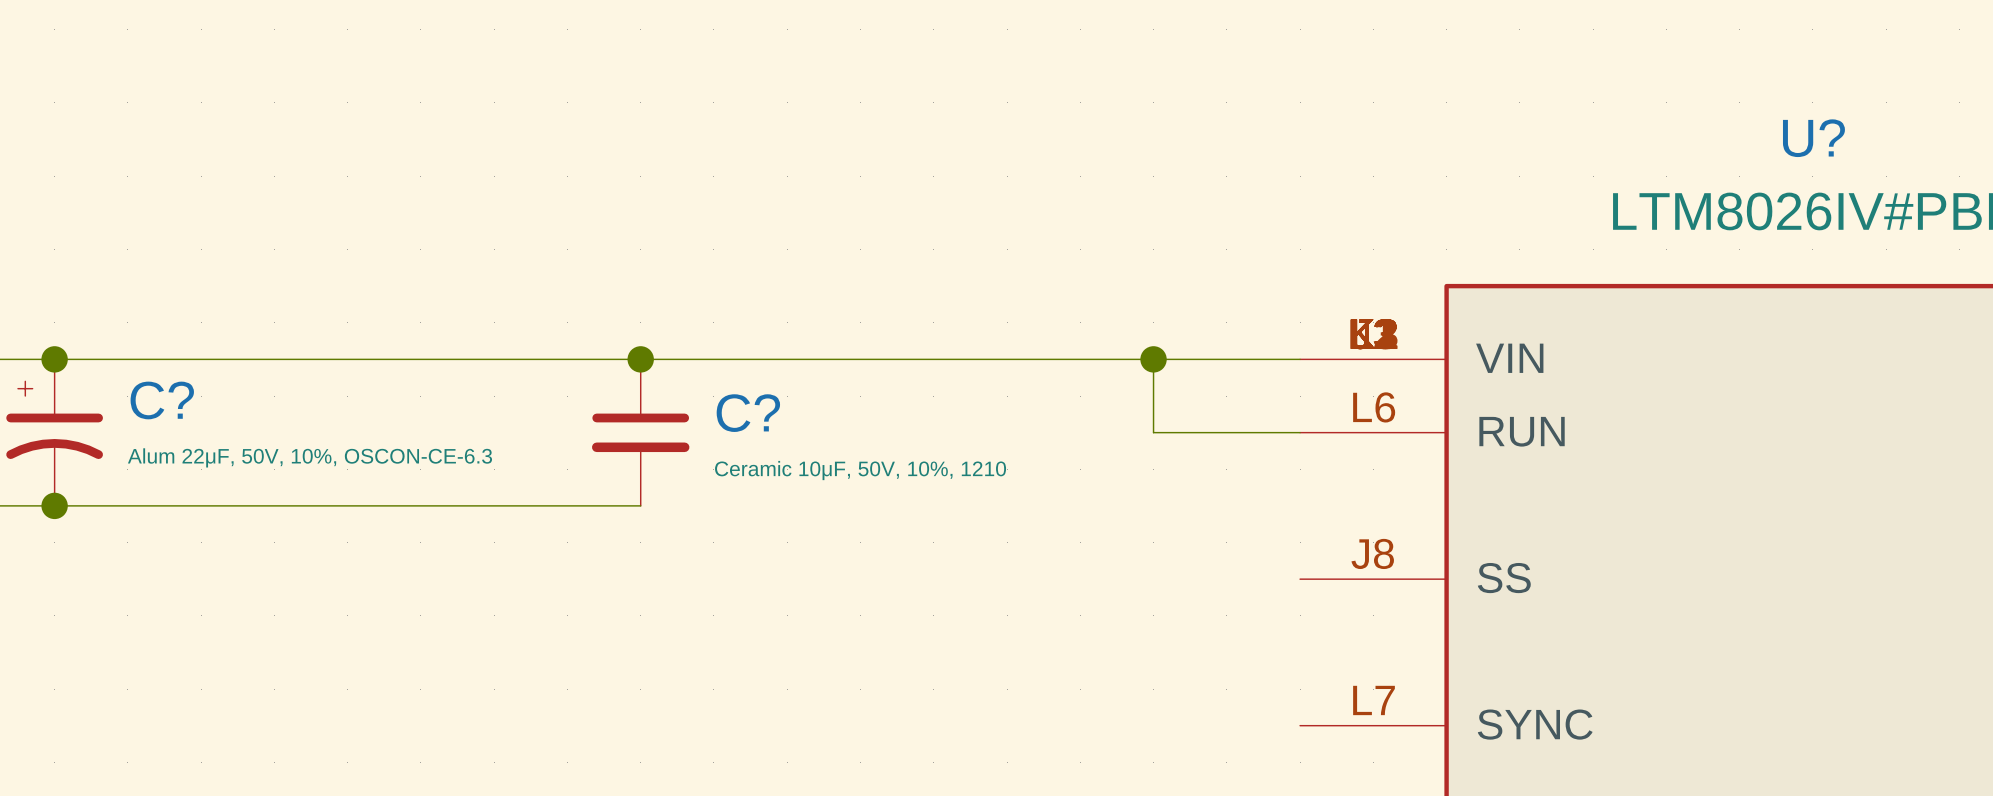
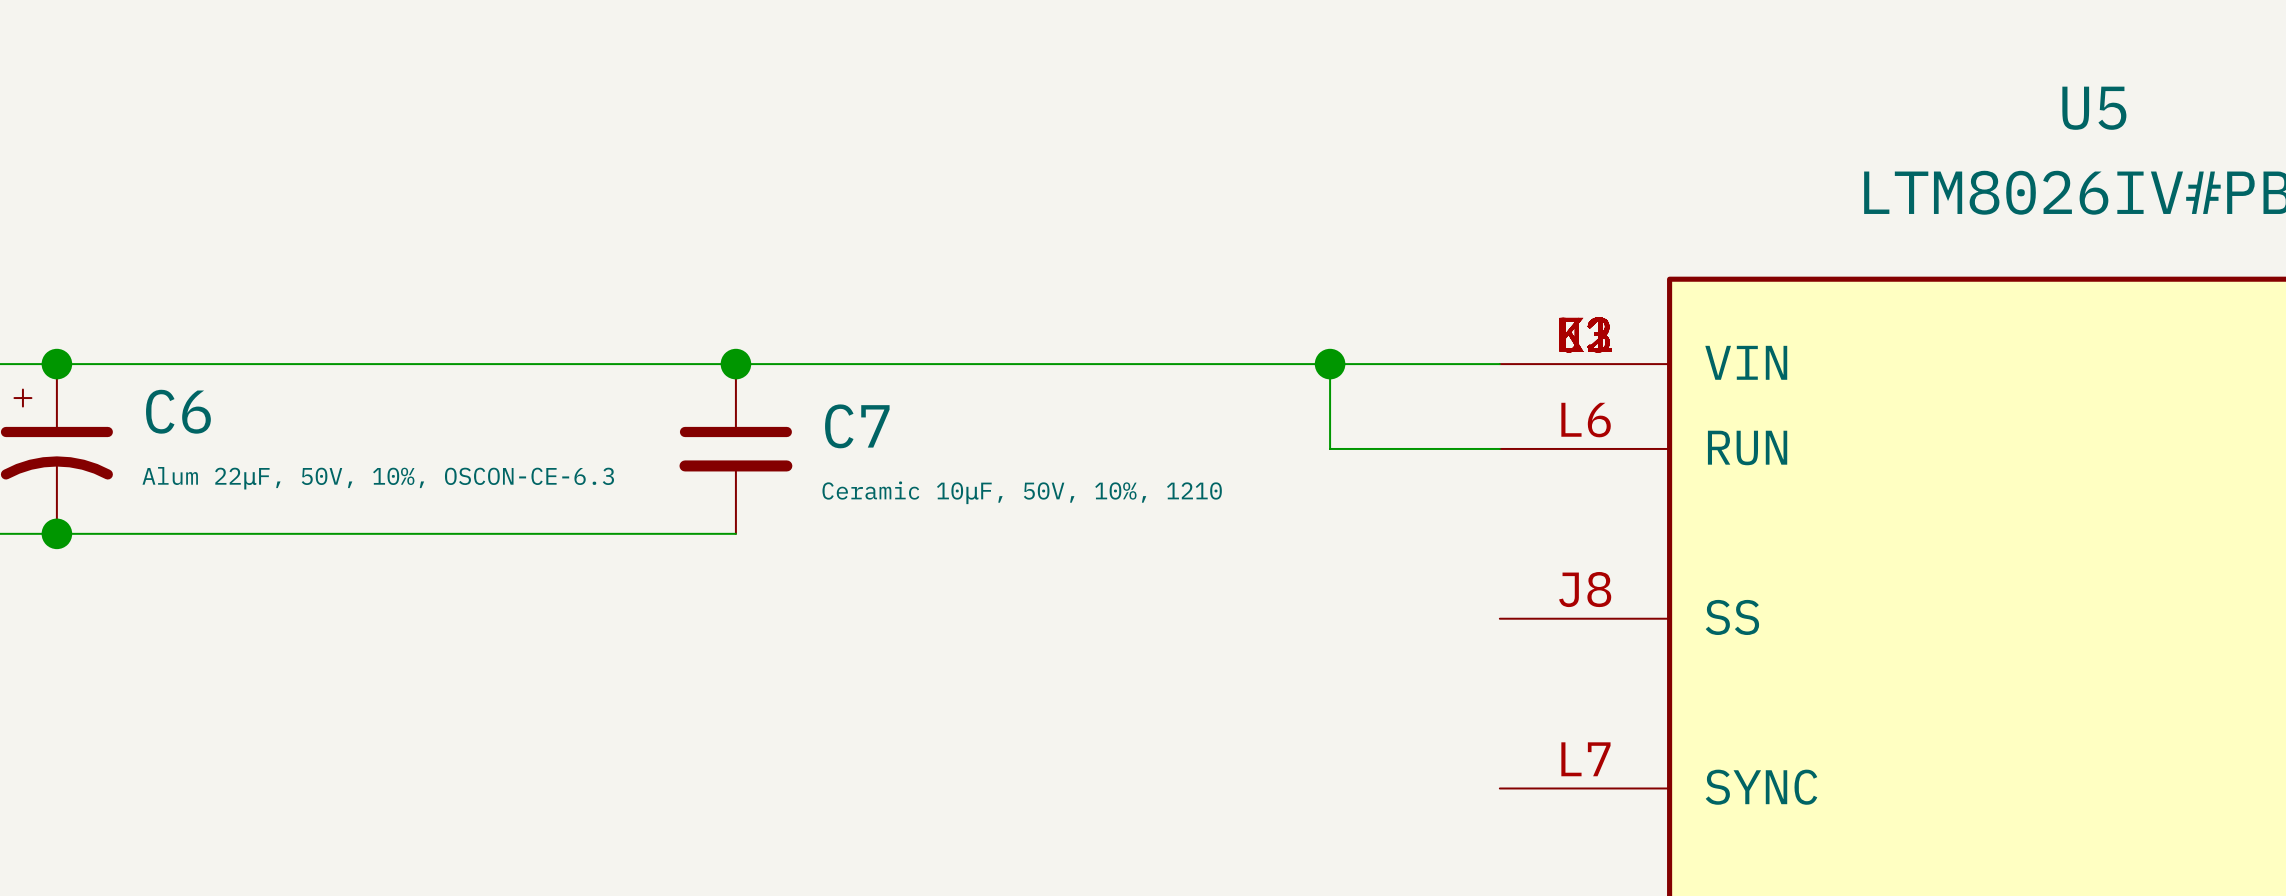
U? name: U? (1813, 138) -> U5 (2094, 108)
C? name: C? (162, 400) -> C6 (178, 411)
C? name: C? (748, 413) -> C7 (857, 426)

